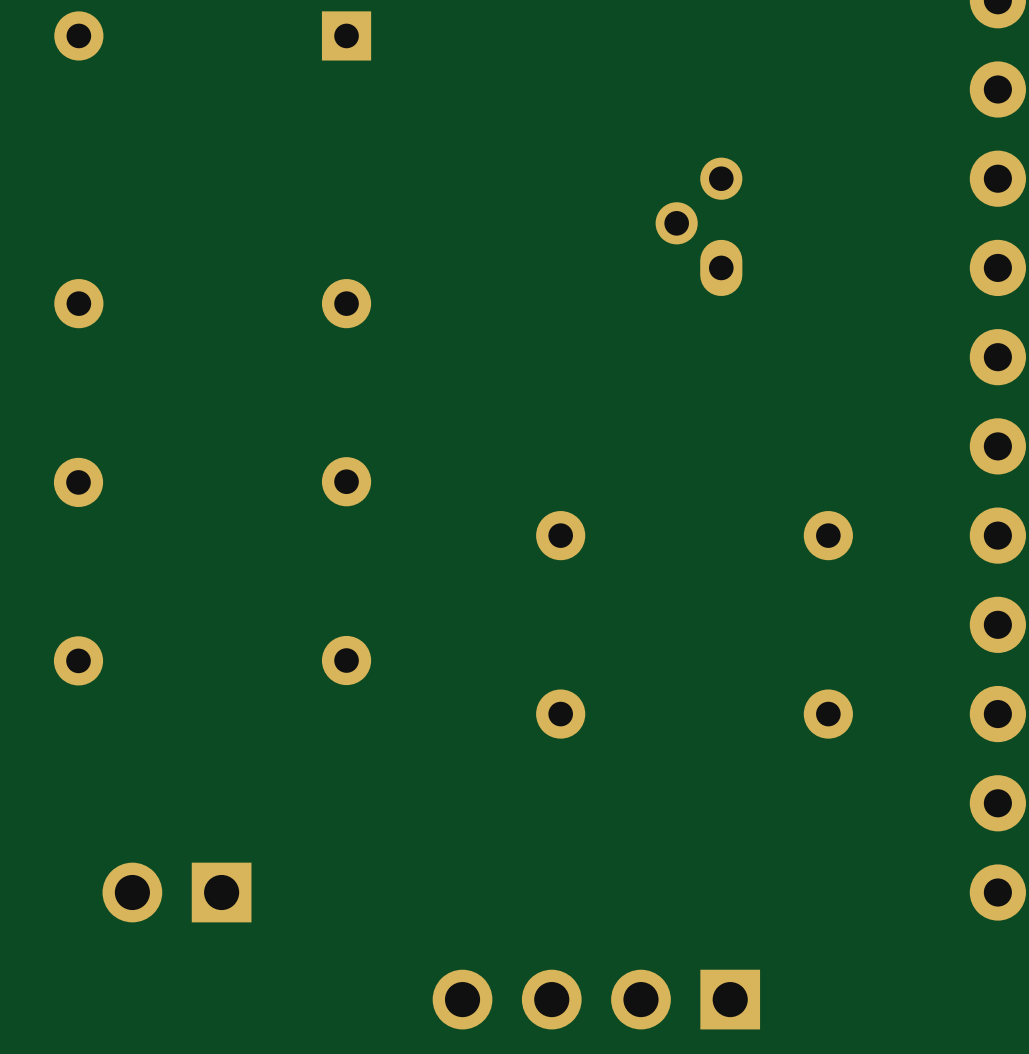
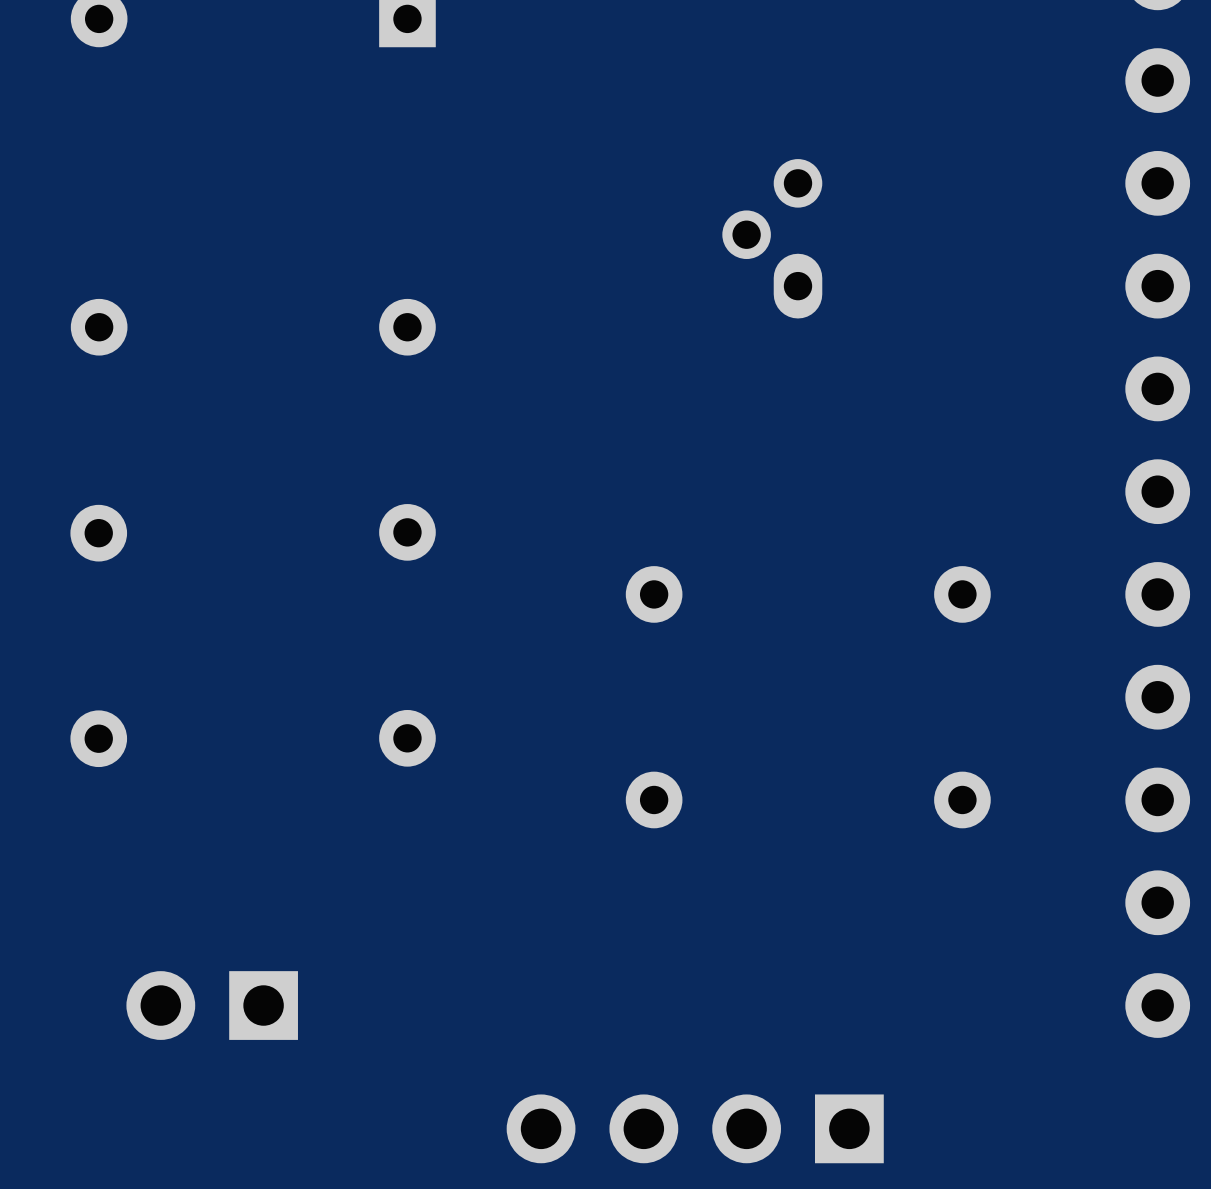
part position: (698, 226) -> (772, 238)

